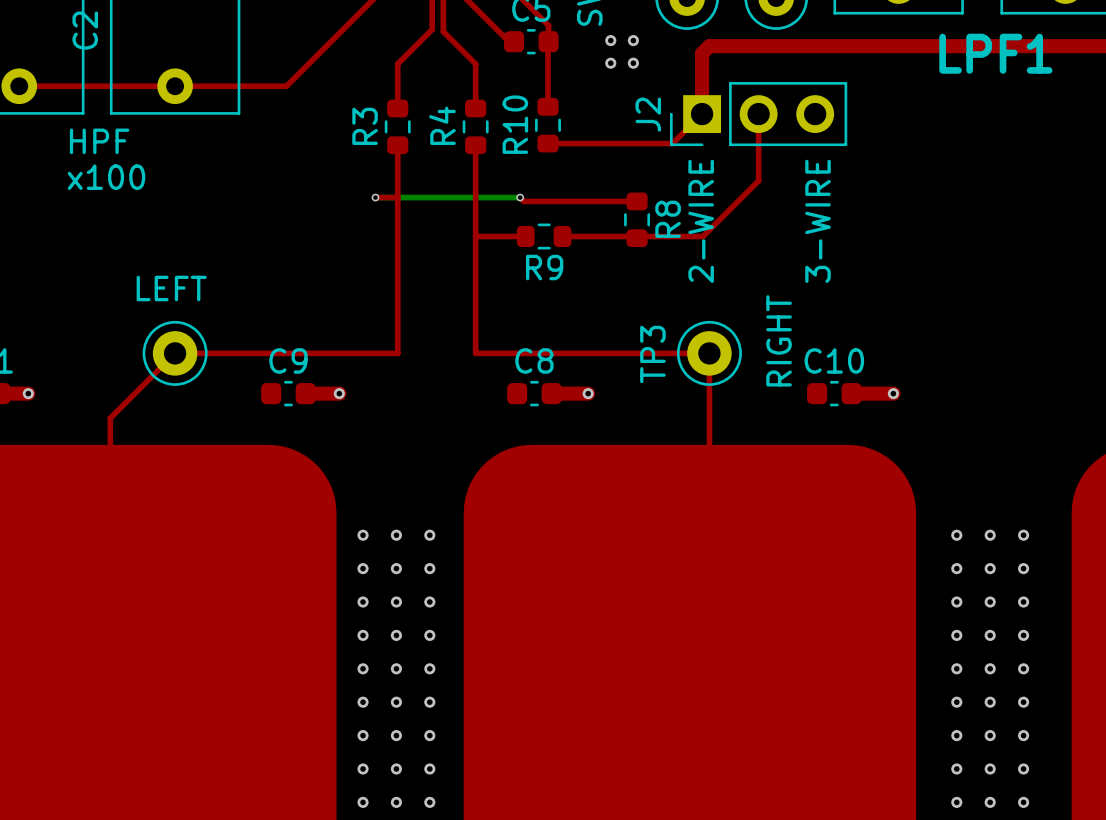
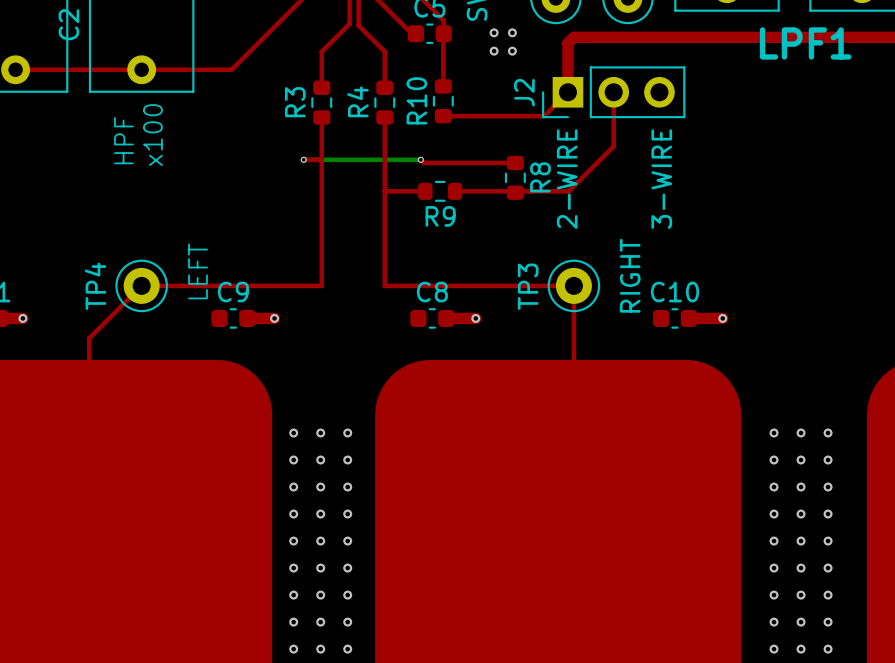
text rotation: 0° (99, 141) -> 90° counterclockwise (123, 140)
text rotation: 0° (106, 177) -> 90° counterclockwise (152, 135)
text rotation: 0° (171, 288) -> 90° counterclockwise (197, 271)
TP4 name: none -> TP4 (95, 286)

